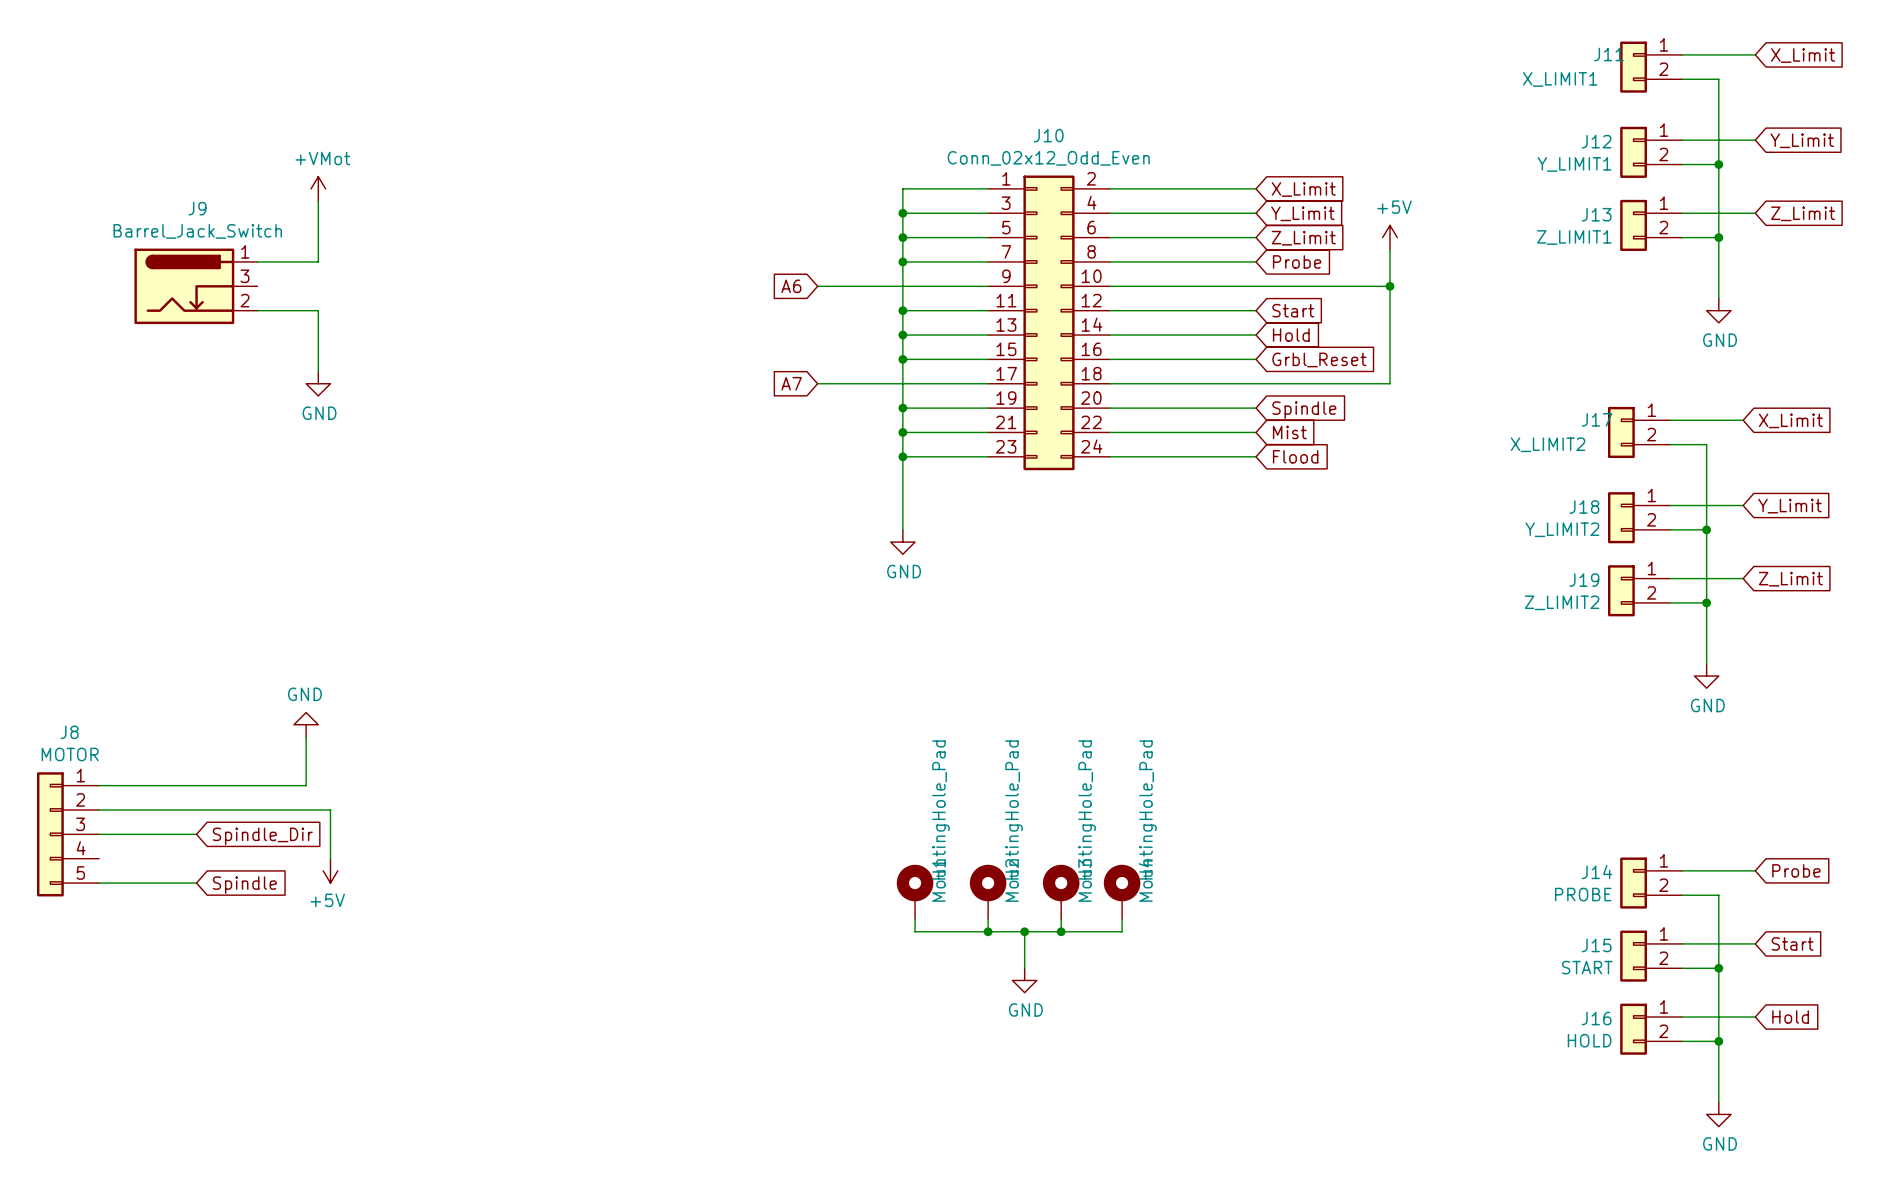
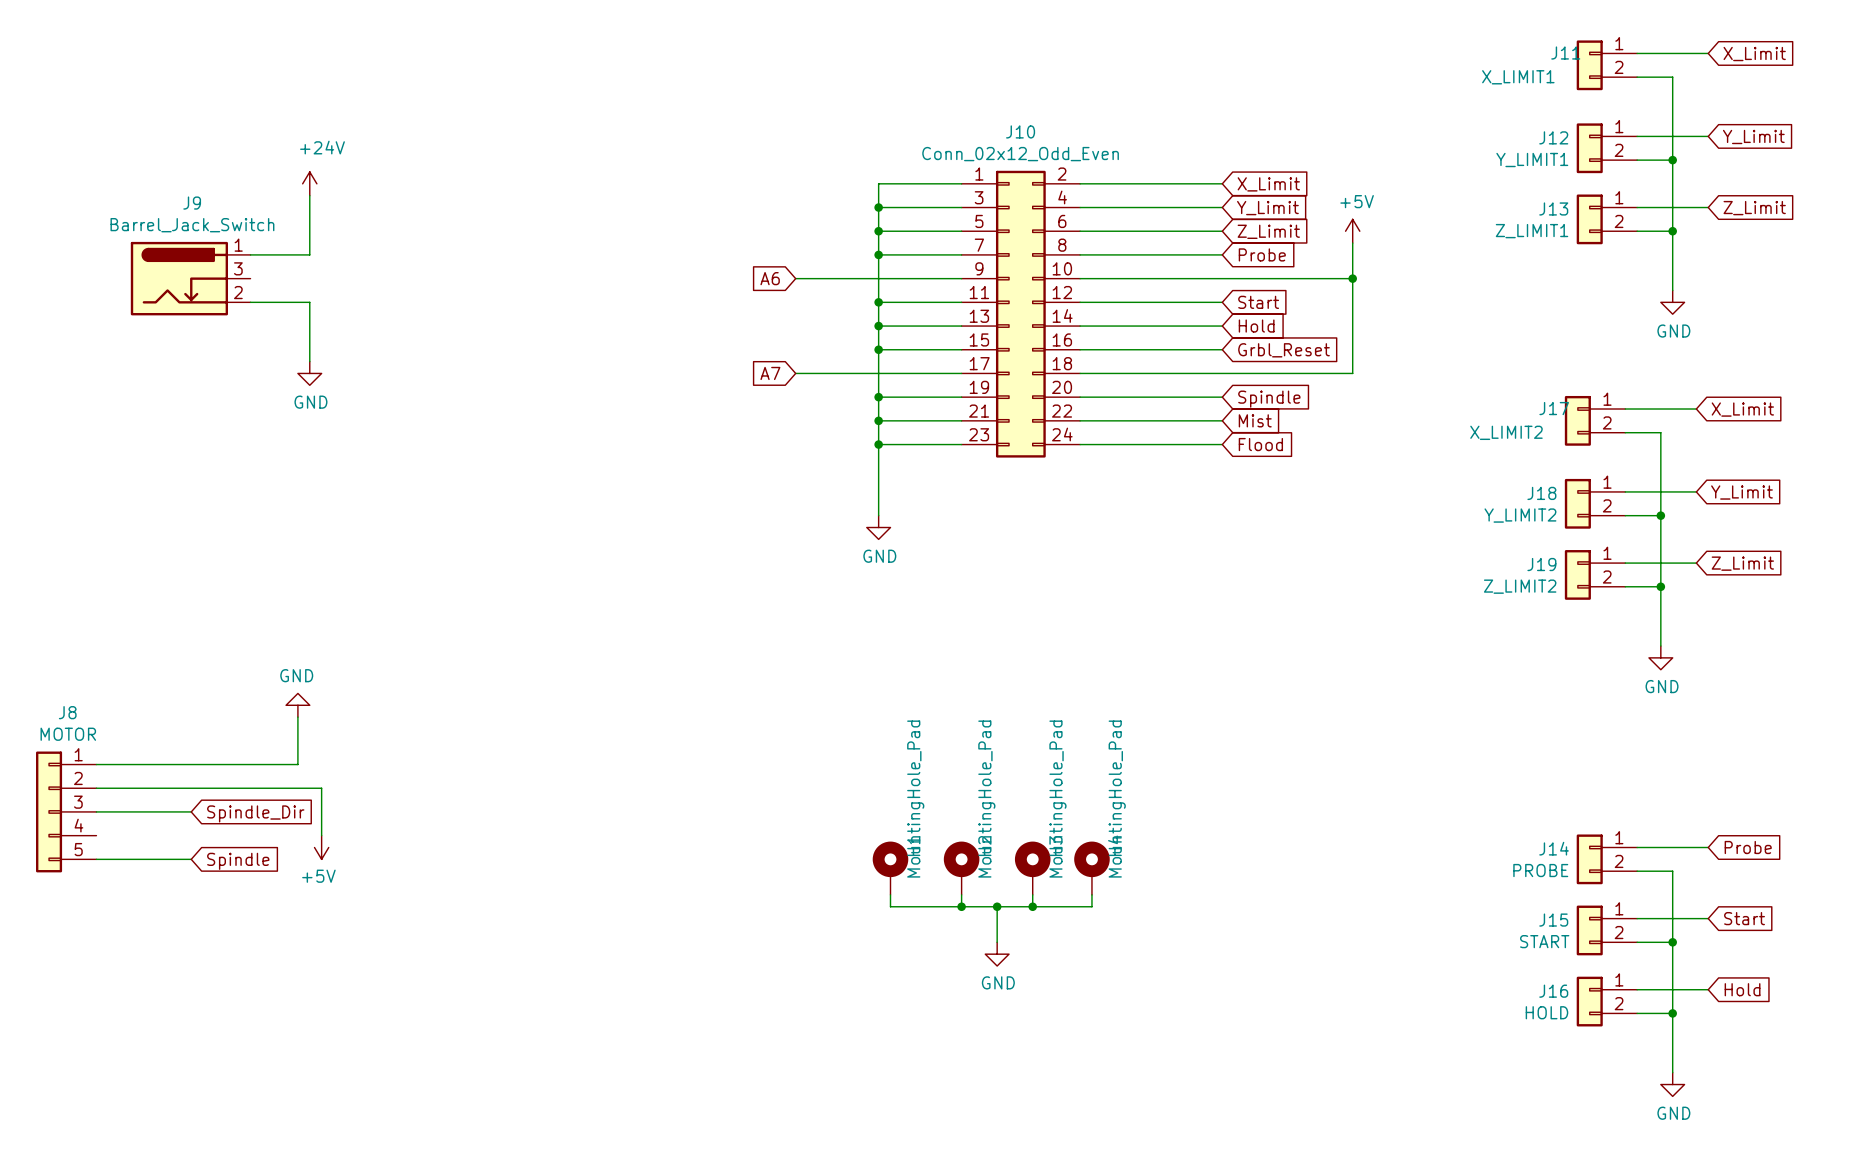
power symbol: +VMot (318, 188) -> +24V (309, 183)

